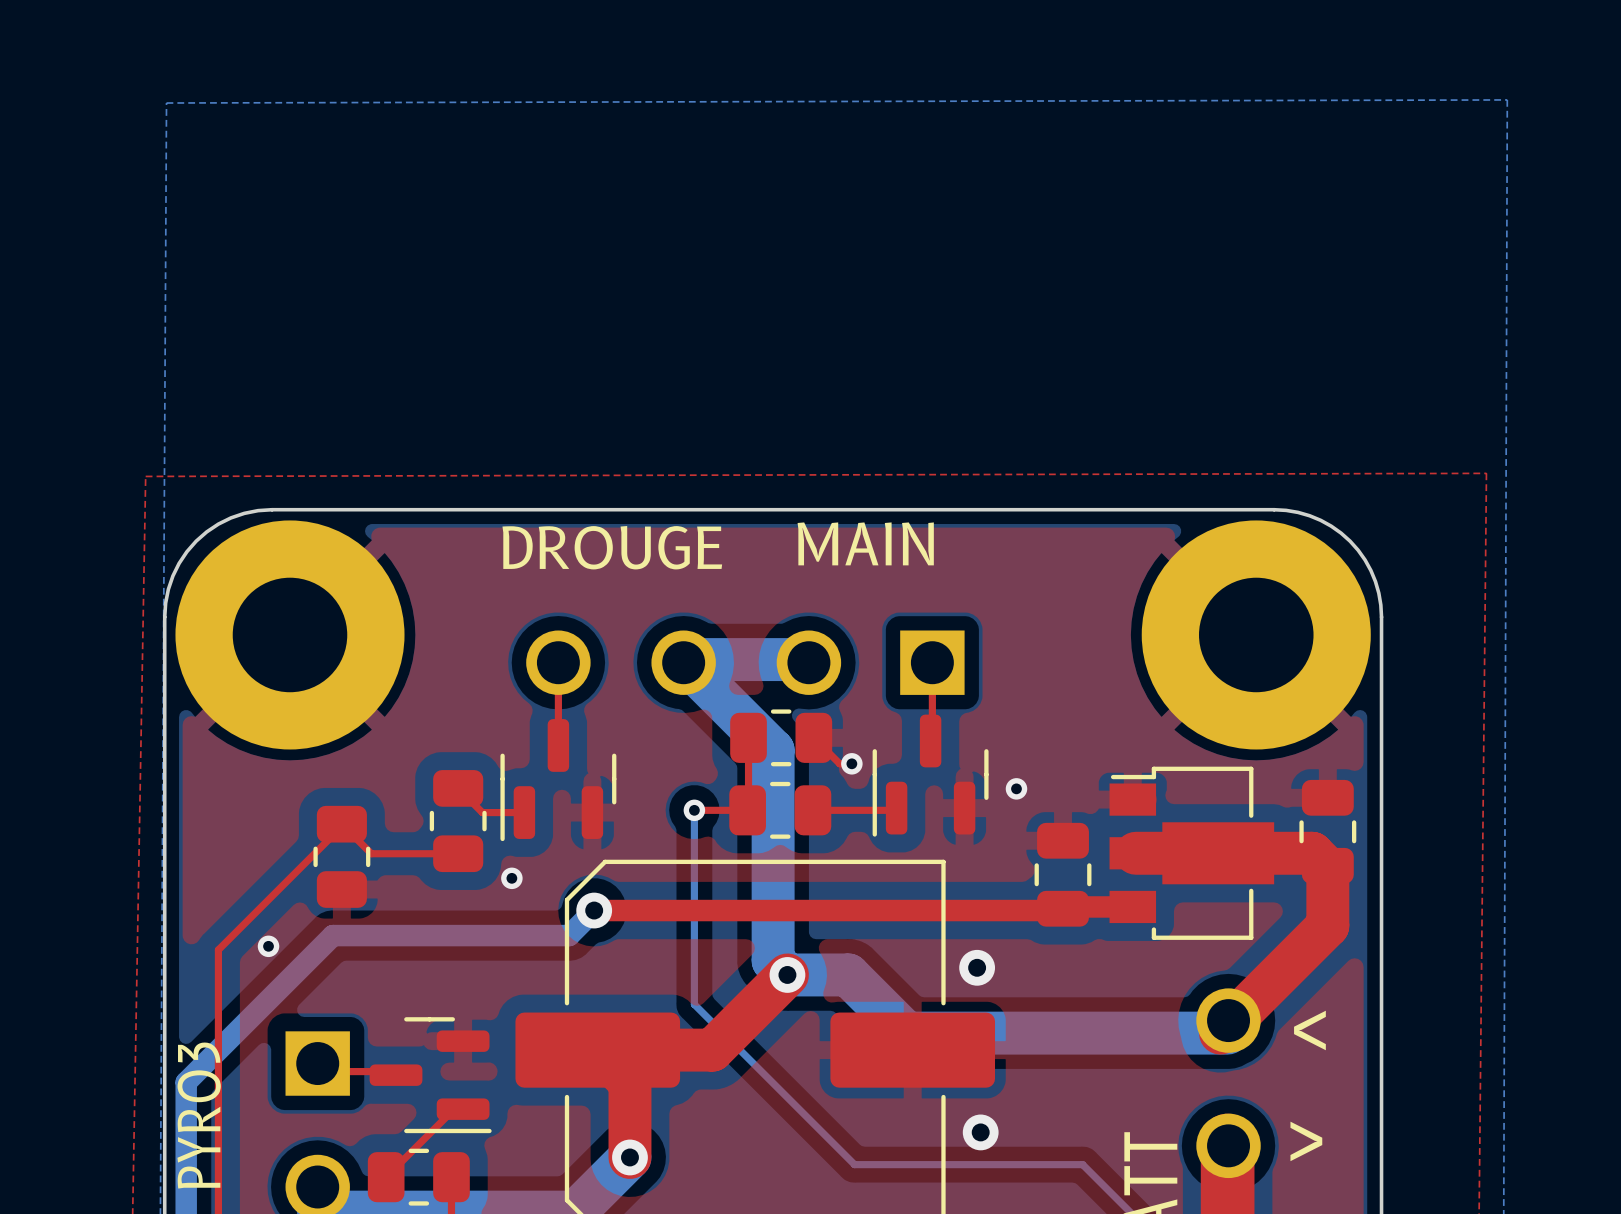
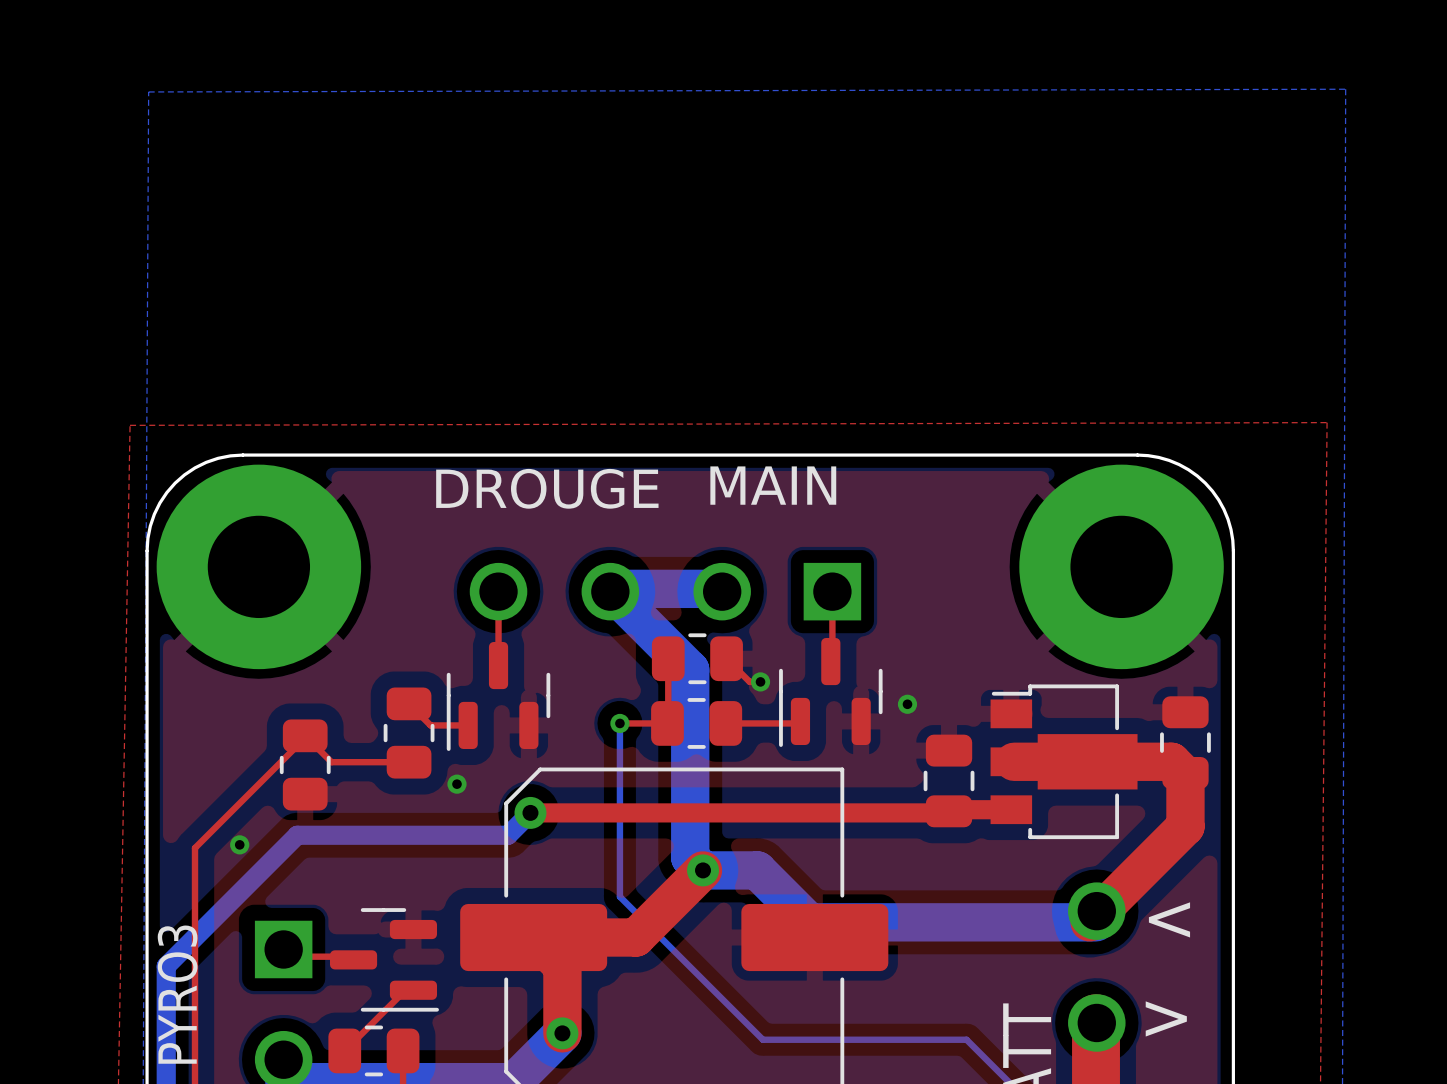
via: (977, 967) -> none
via: (980, 1132) -> none

